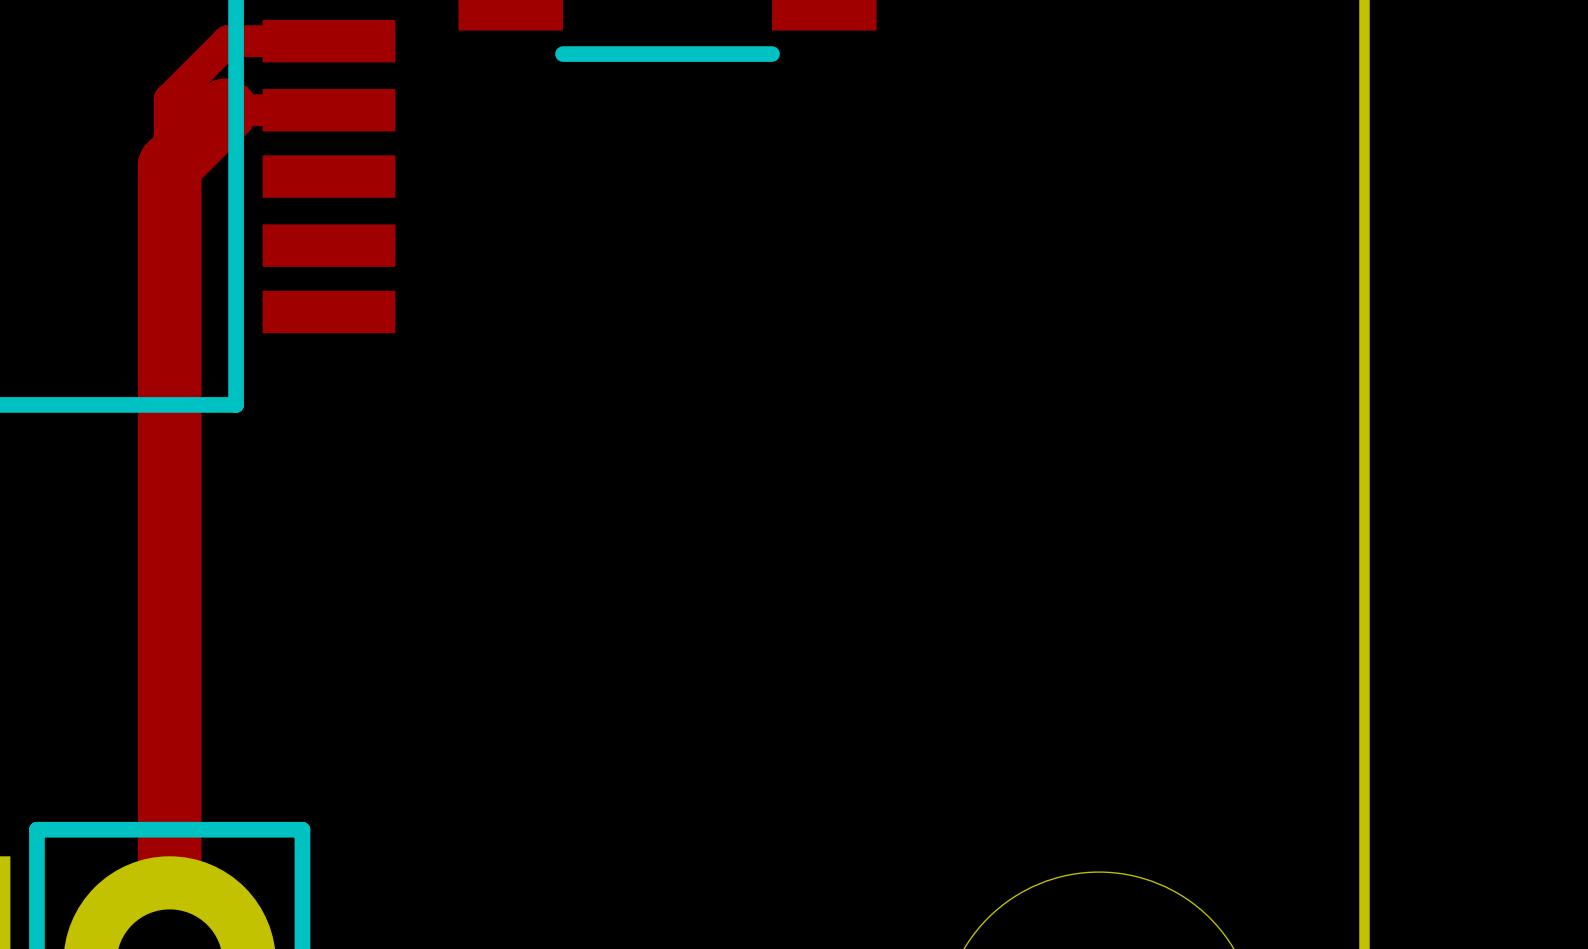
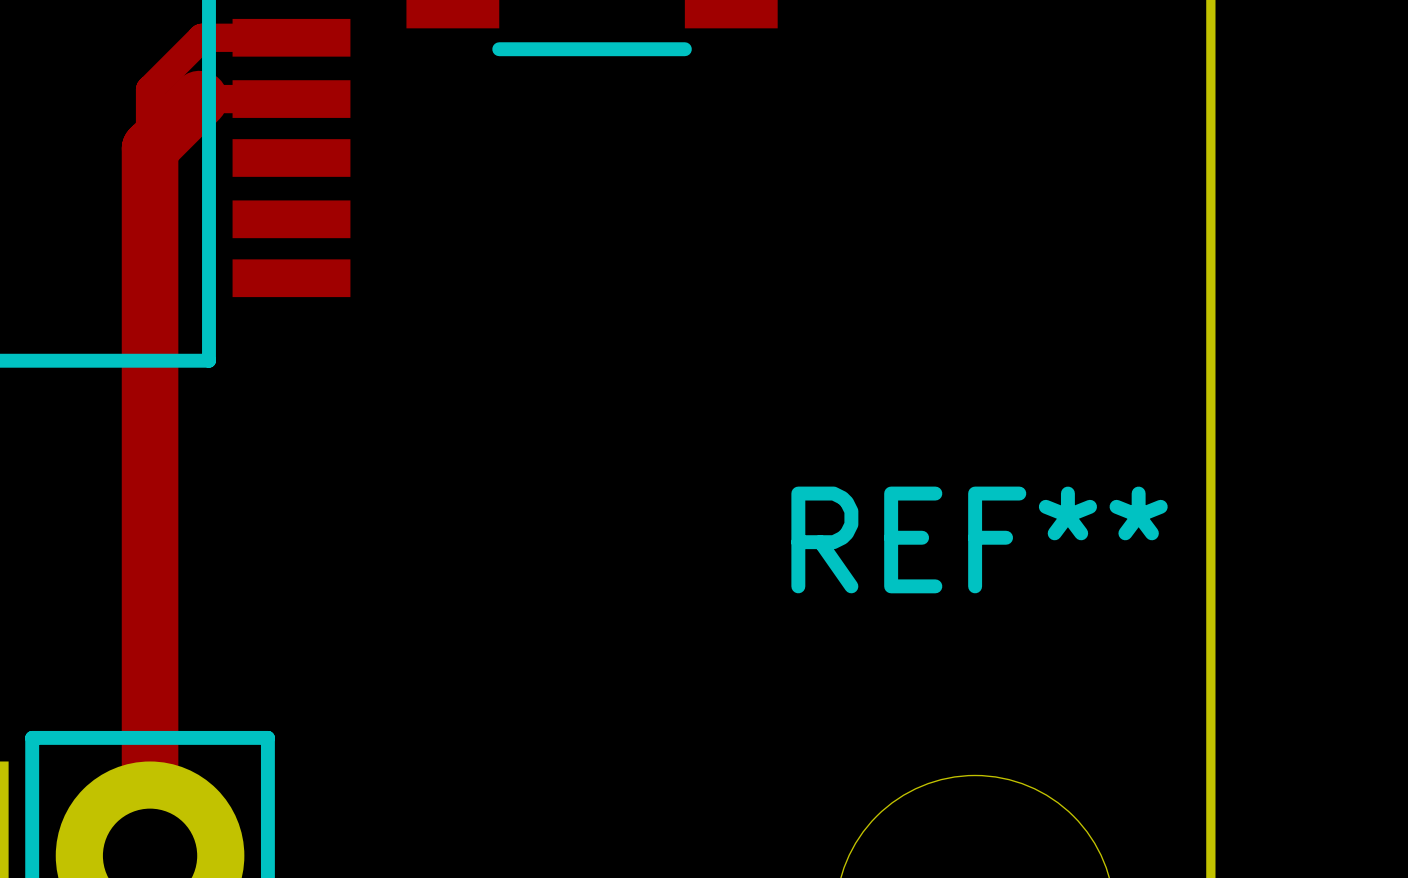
REF** name: none -> REF** (979, 539)

